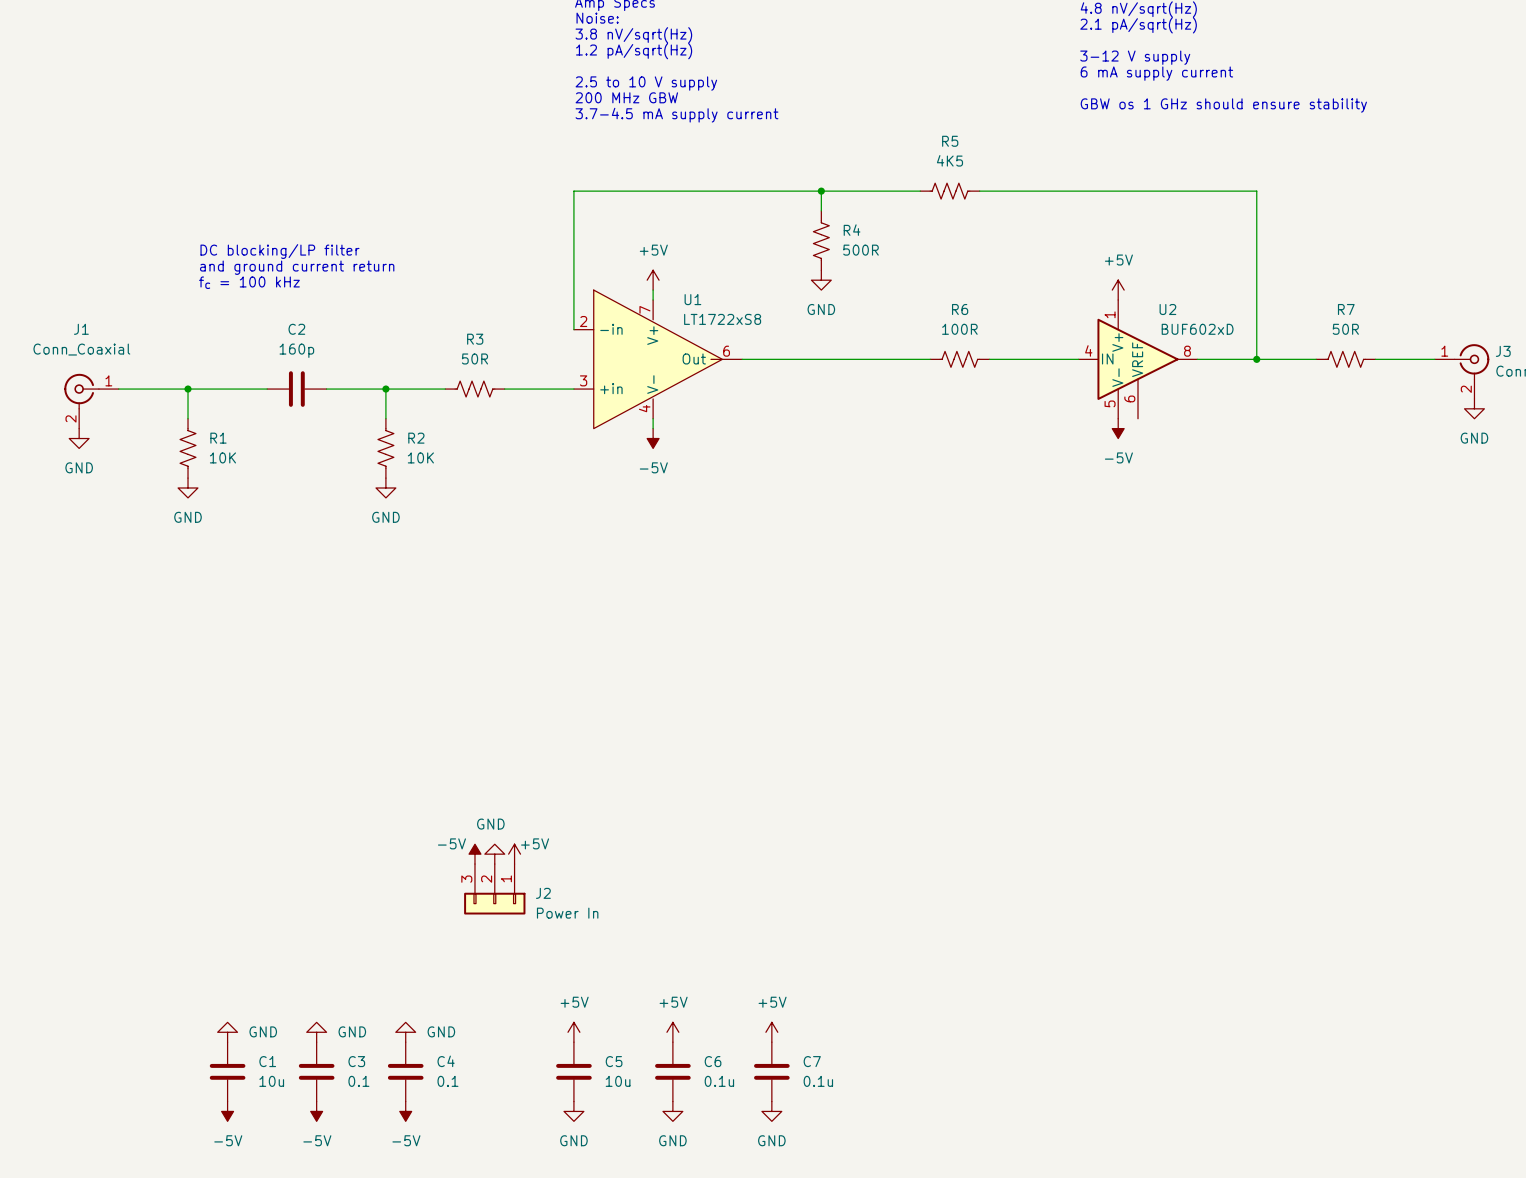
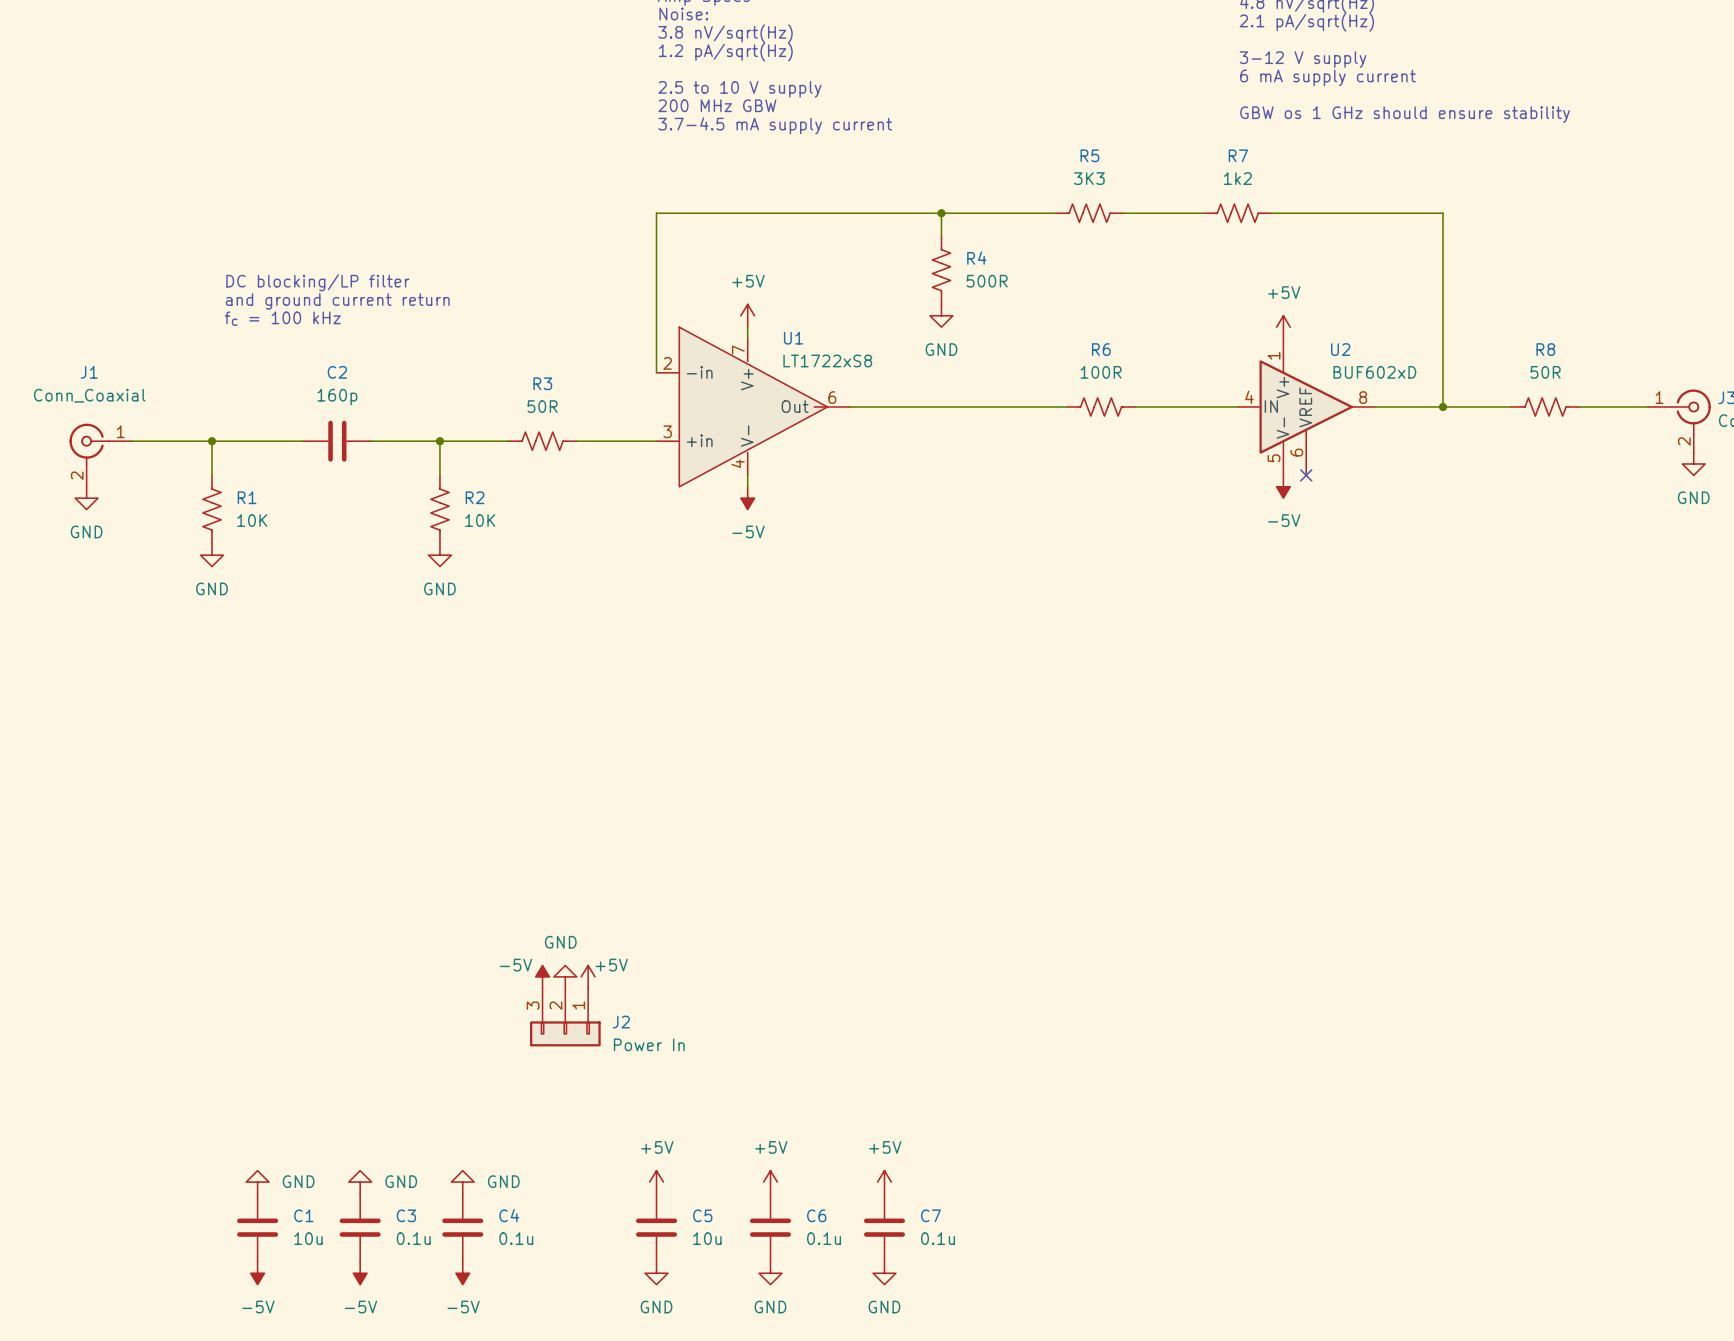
R5 value: 4K5 (949, 160) -> 3K3 (1089, 178)
R7: none -> 1k2 (1237, 213)
R7 name: R7 (1346, 309) -> R8 (1545, 349)
no-connect mark: none -> (1306, 475)
C3 value: 0.1 (358, 1081) -> 0.1u (413, 1238)
C4 value: 0.1 (447, 1081) -> 0.1u (516, 1238)

